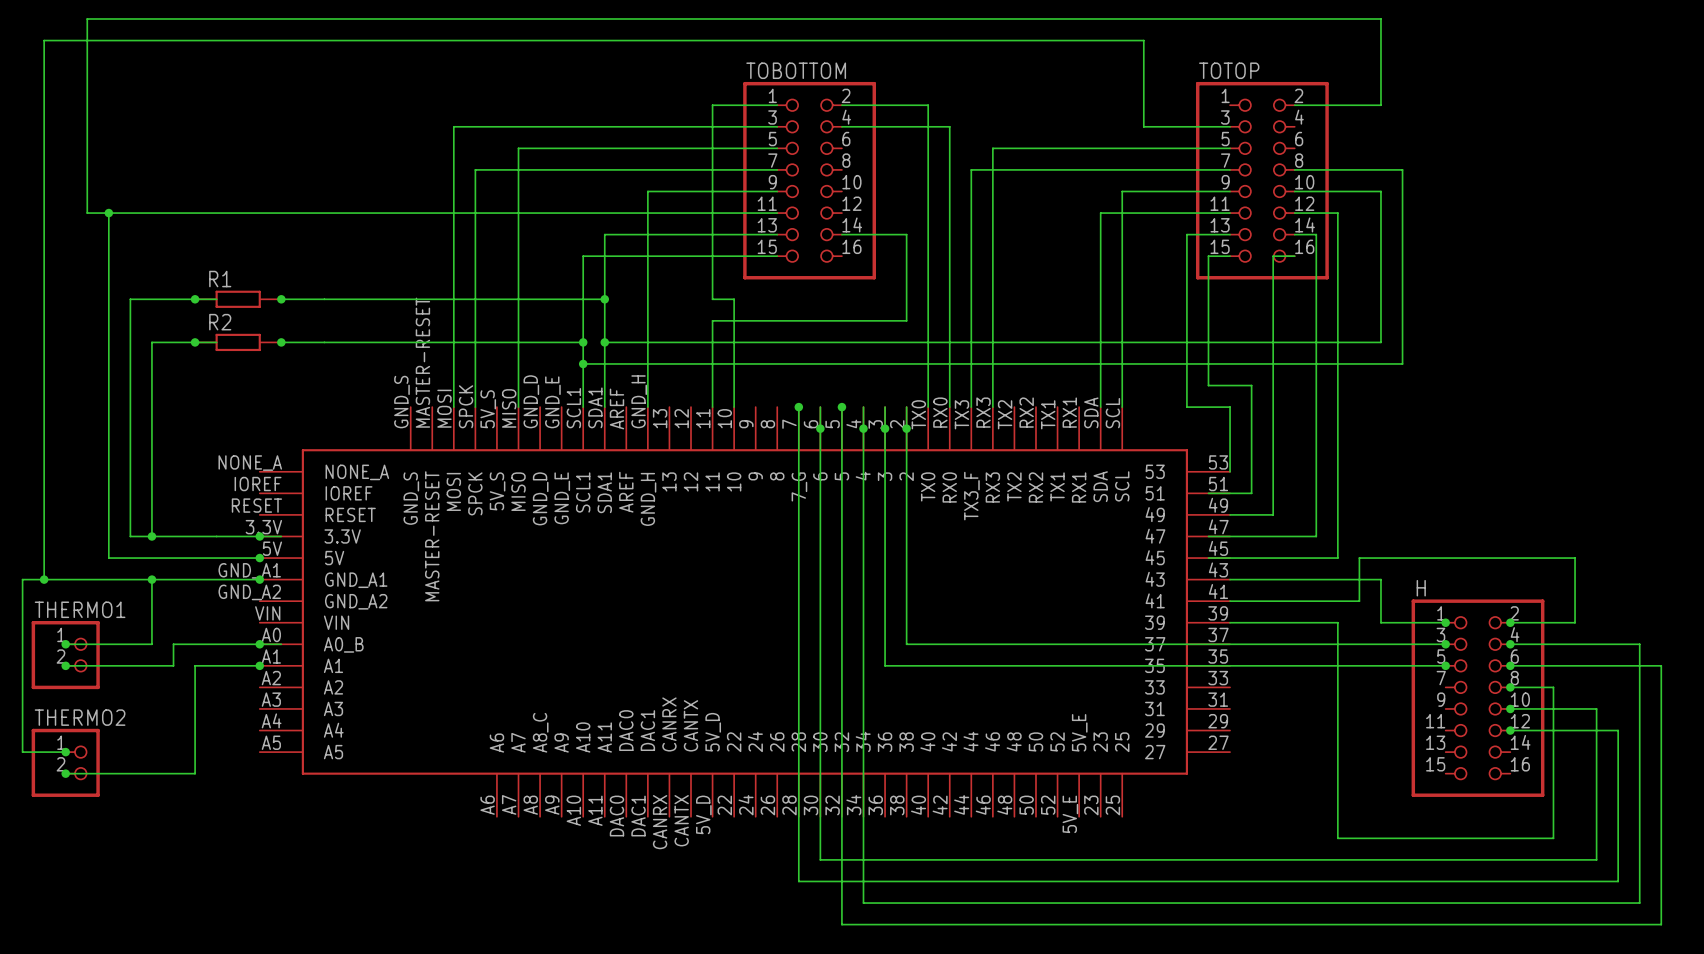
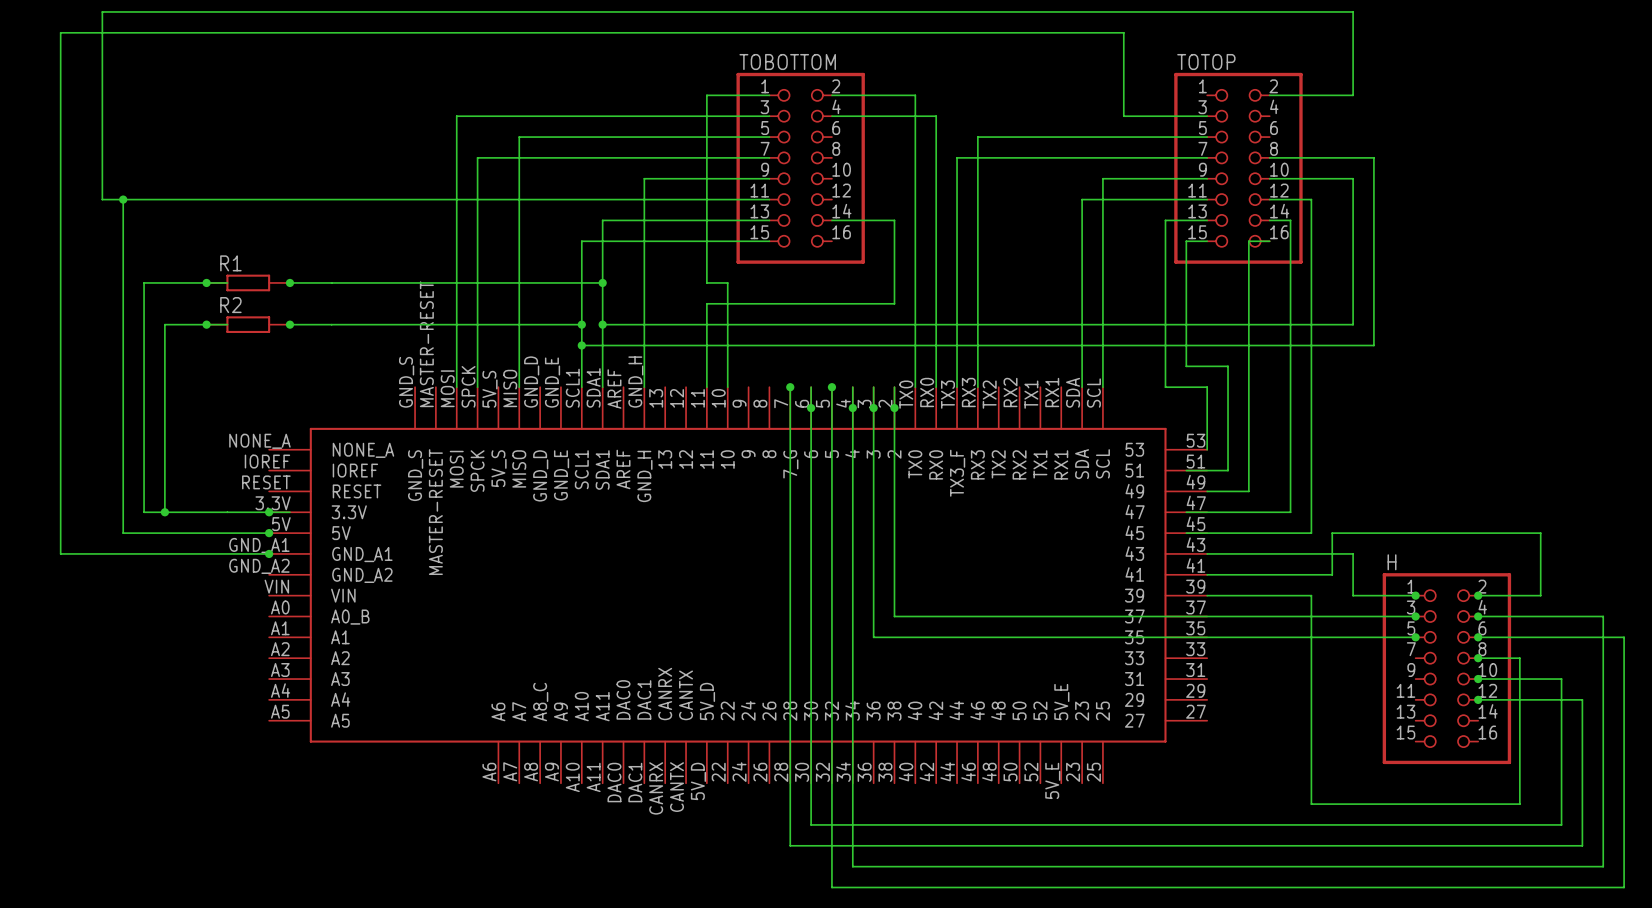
wire: (44, 579) (22, 579) (22, 752) (65, 752) -> none
junction: (44, 579) -> none
wire: (151, 579) (151, 644) (65, 644) -> none
junction: (151, 579) -> none
junction: (65, 644) -> none
junction: (259, 644) -> none
wire: (281, 644) (173, 644) (173, 665) (65, 665) -> none
THERMO1: (65, 655) -> none
junction: (65, 665) -> none
wire: (259, 665) (195, 665) (195, 773) (65, 773) -> none
junction: (259, 665) -> none
junction: (65, 752) -> none
THERMO2: (65, 762) -> none
junction: (65, 773) -> none

